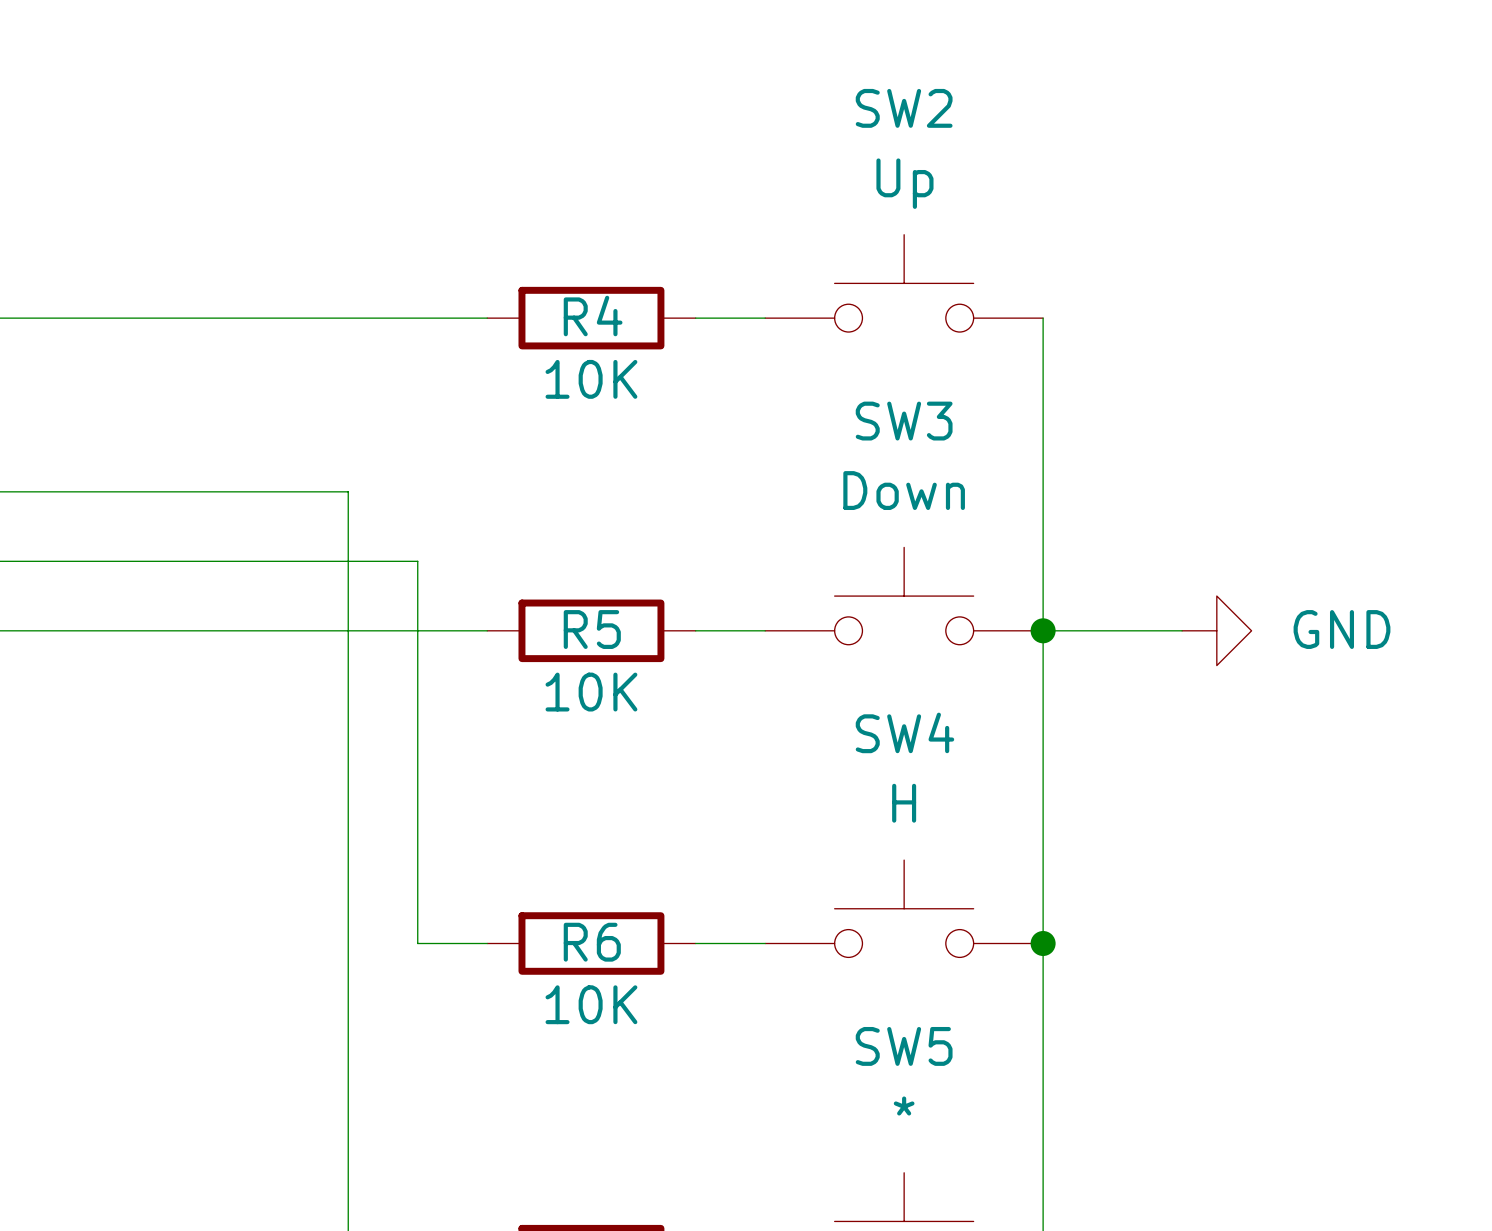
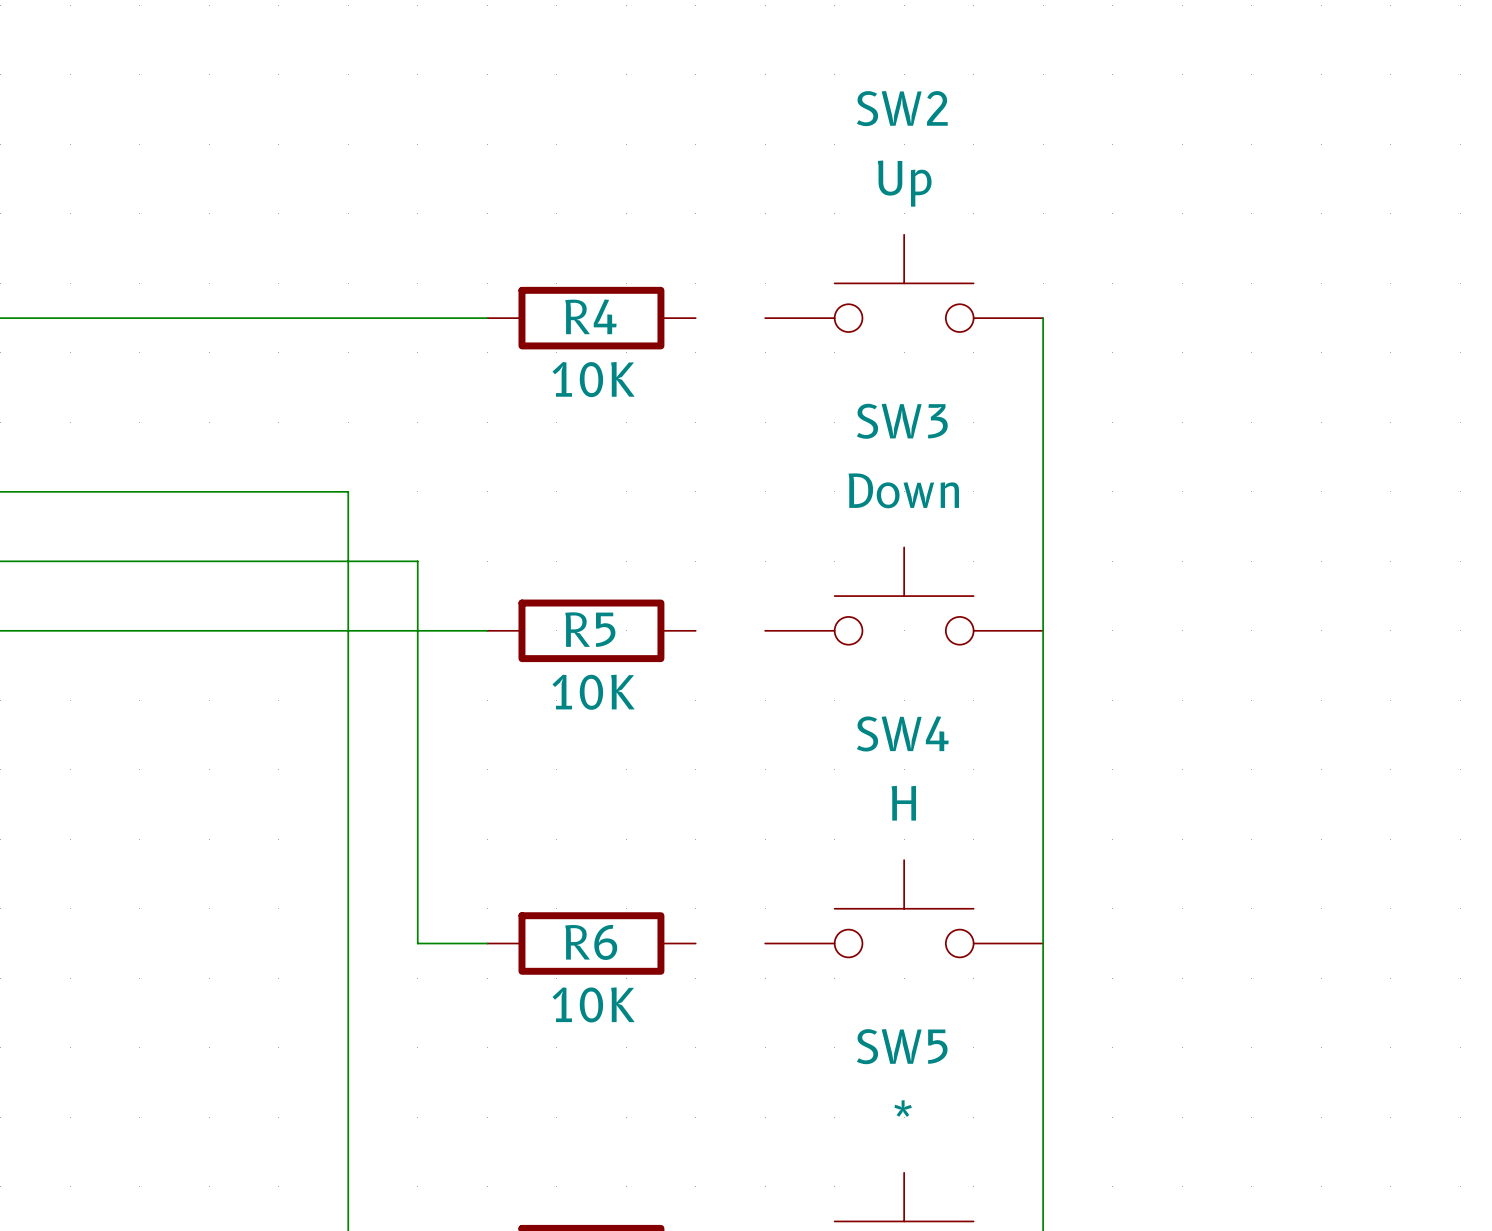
wire: (695, 318) (765, 318) -> none
wire: (695, 630) (765, 630) -> none
wire: (1043, 630) (1182, 630) -> none
junction: (1043, 630) -> none
power symbol: GND (1216, 630) -> none
wire: (695, 943) (765, 943) -> none
junction: (1043, 943) -> none

